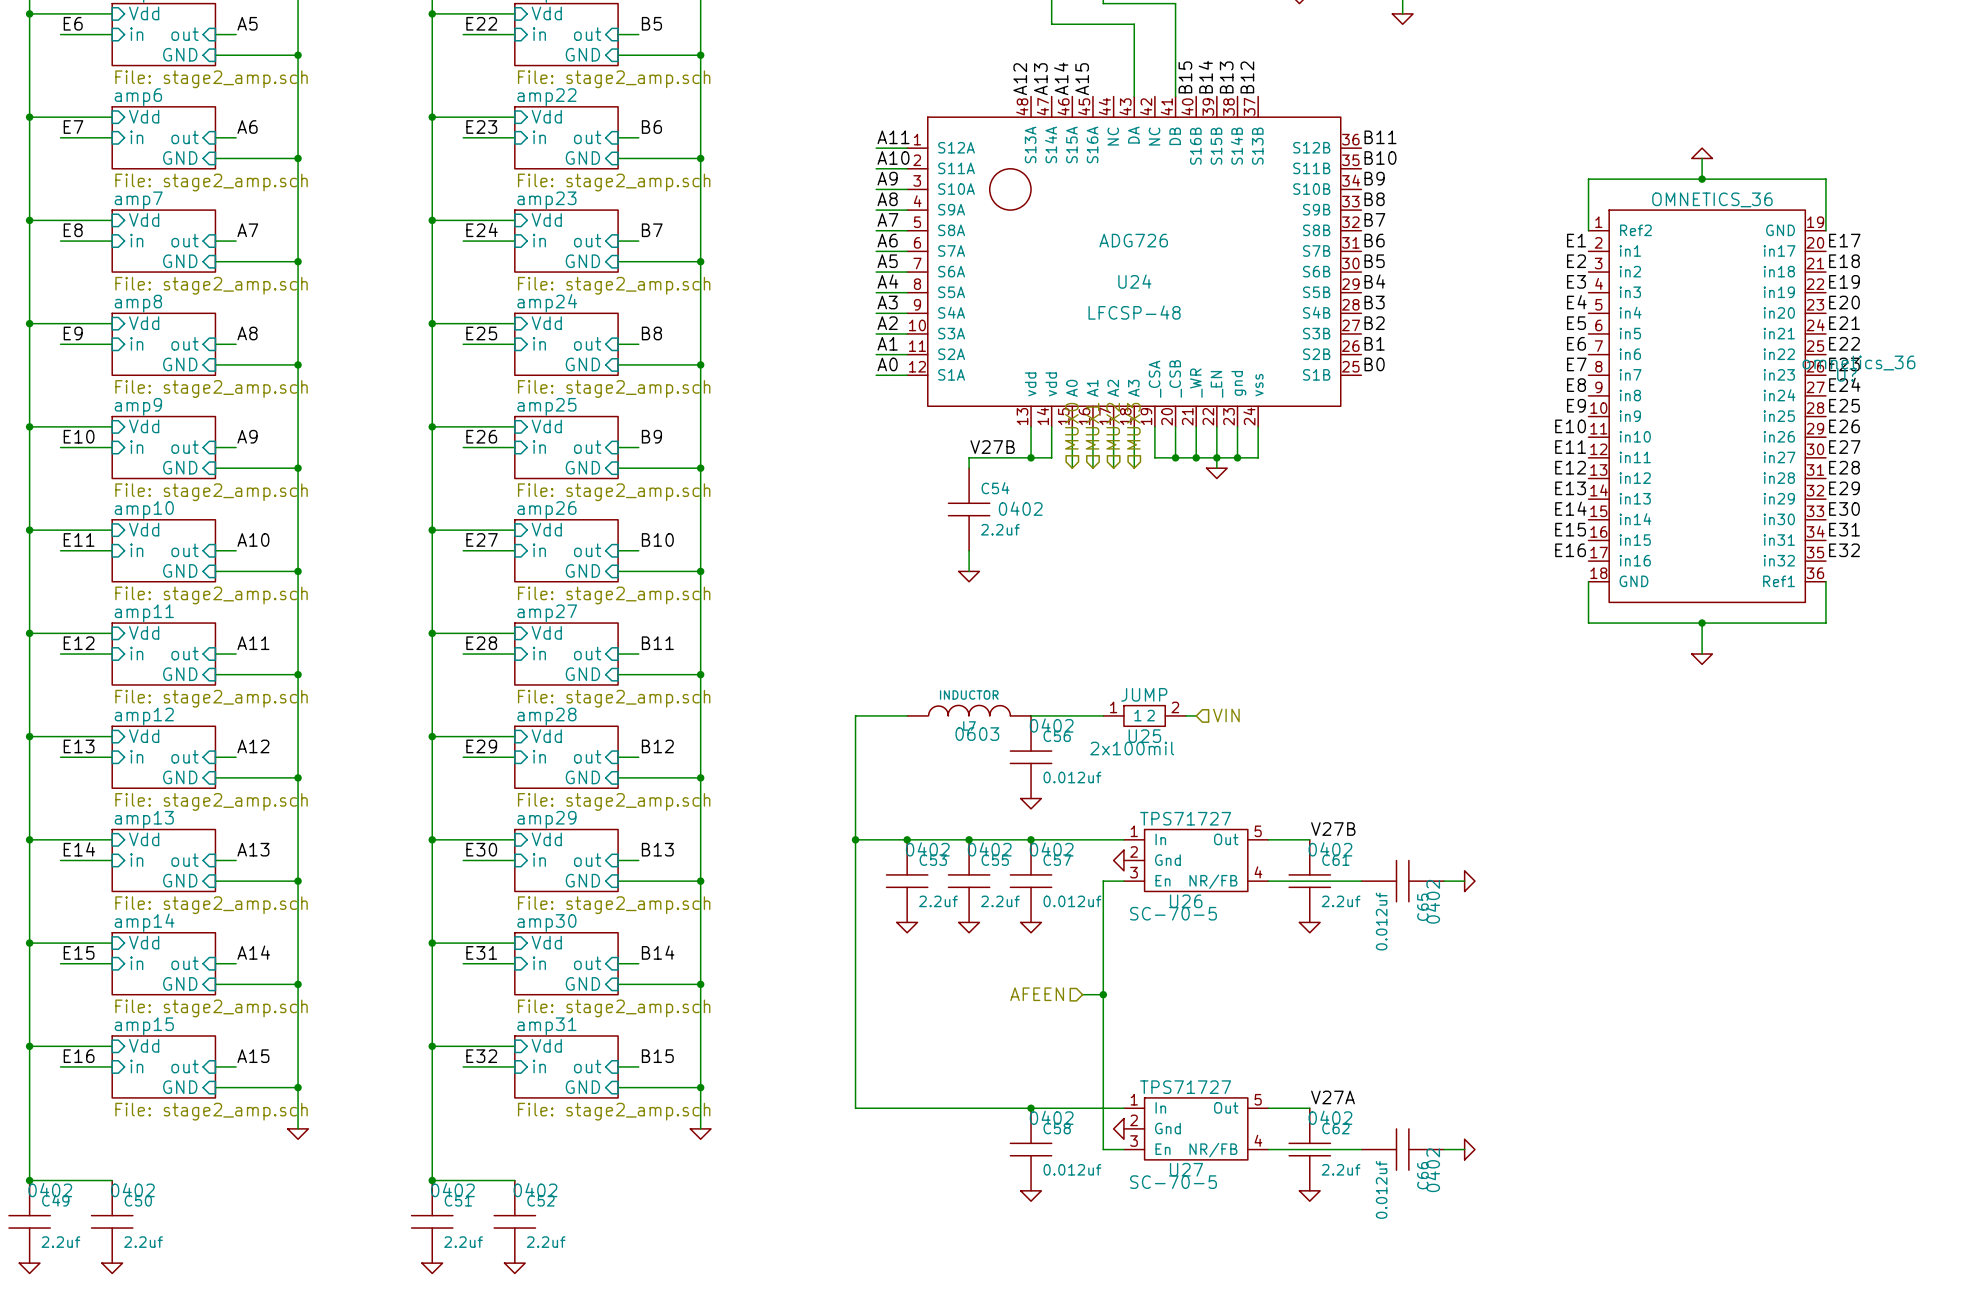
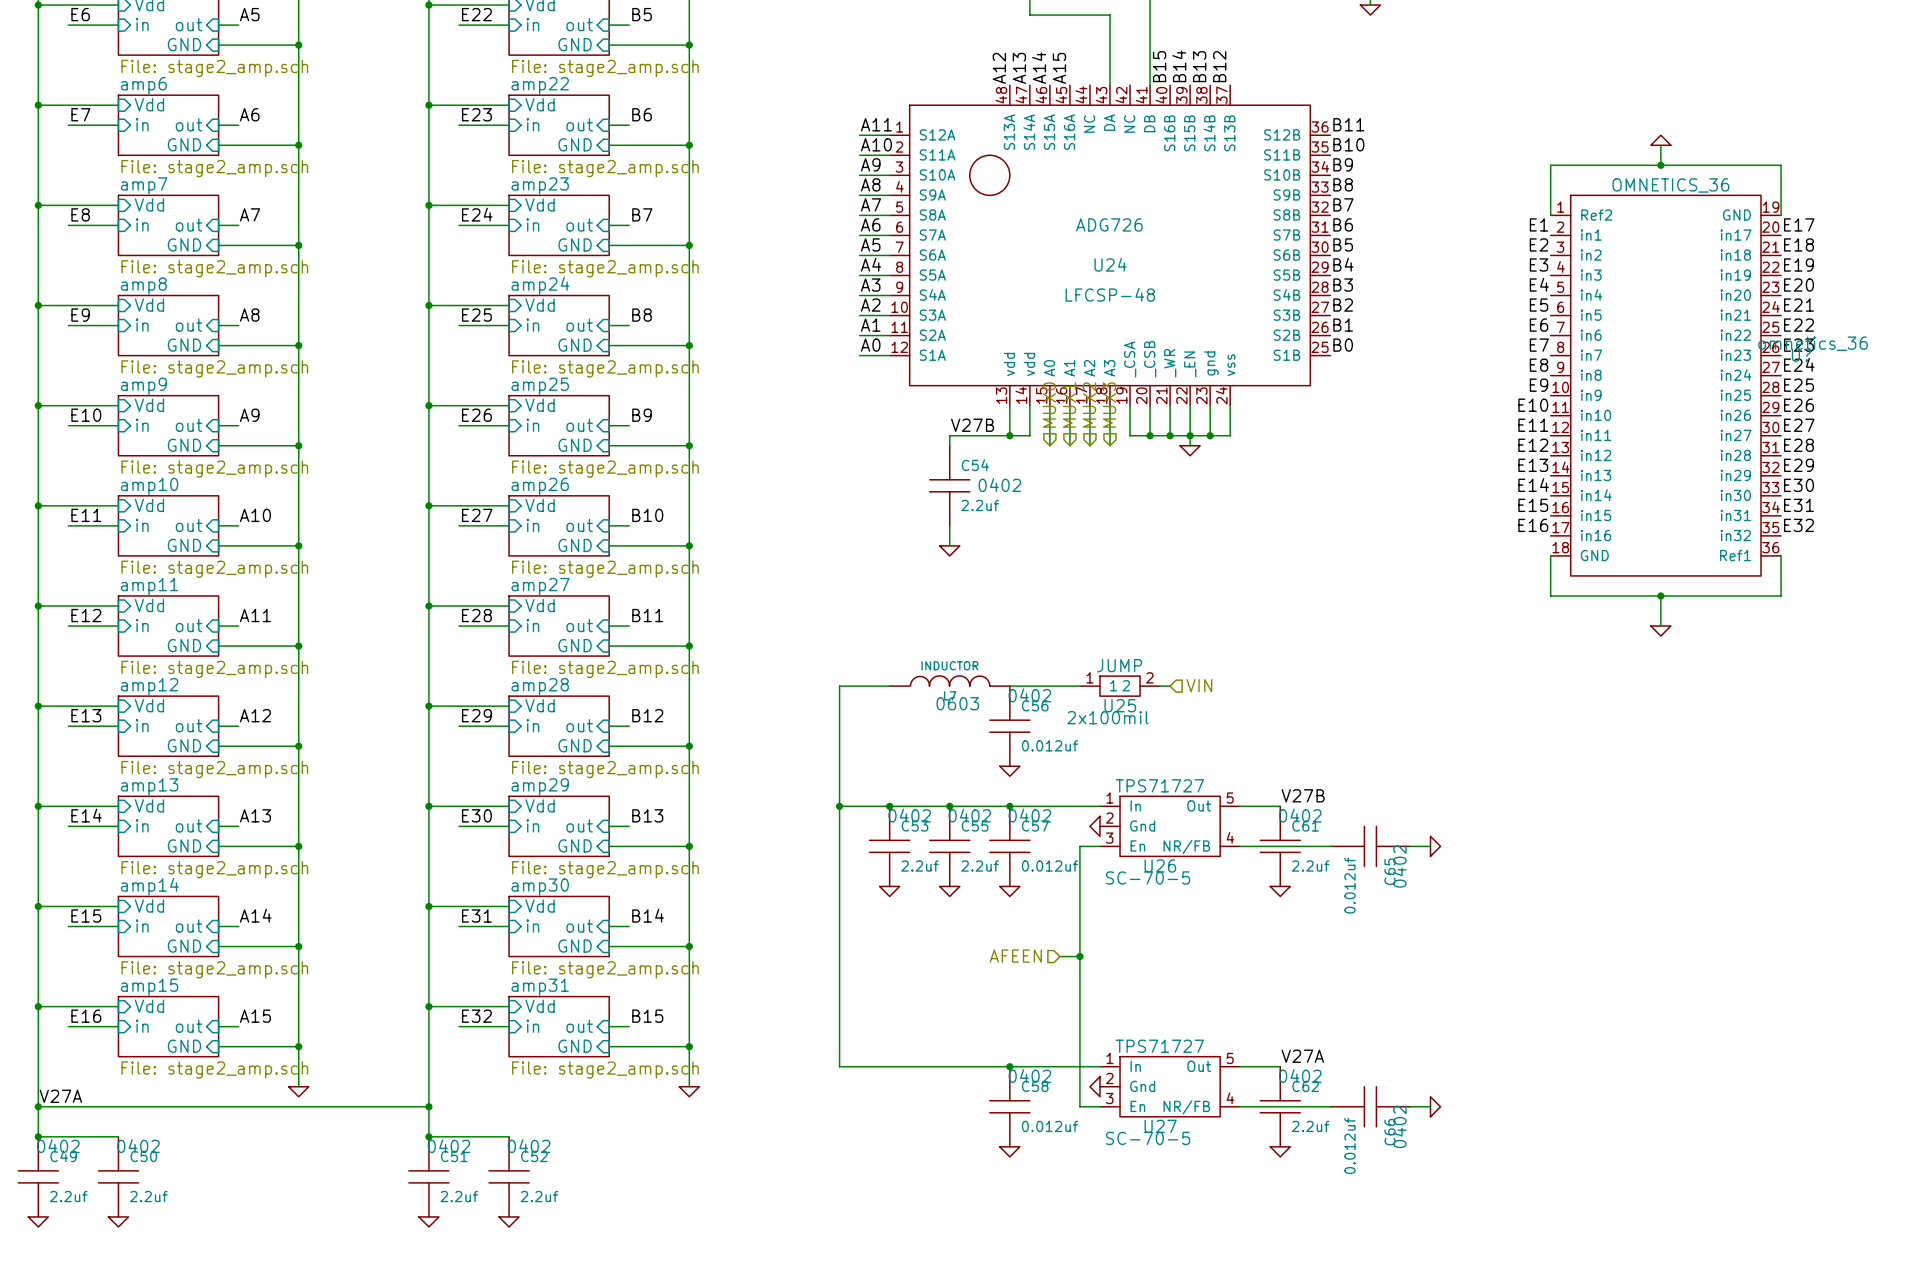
label: none -> V27A (60, 1096)
wire: none -> (38, 1106) (428, 1106)
junction: none -> (38, 1106)
junction: none -> (428, 1106)

